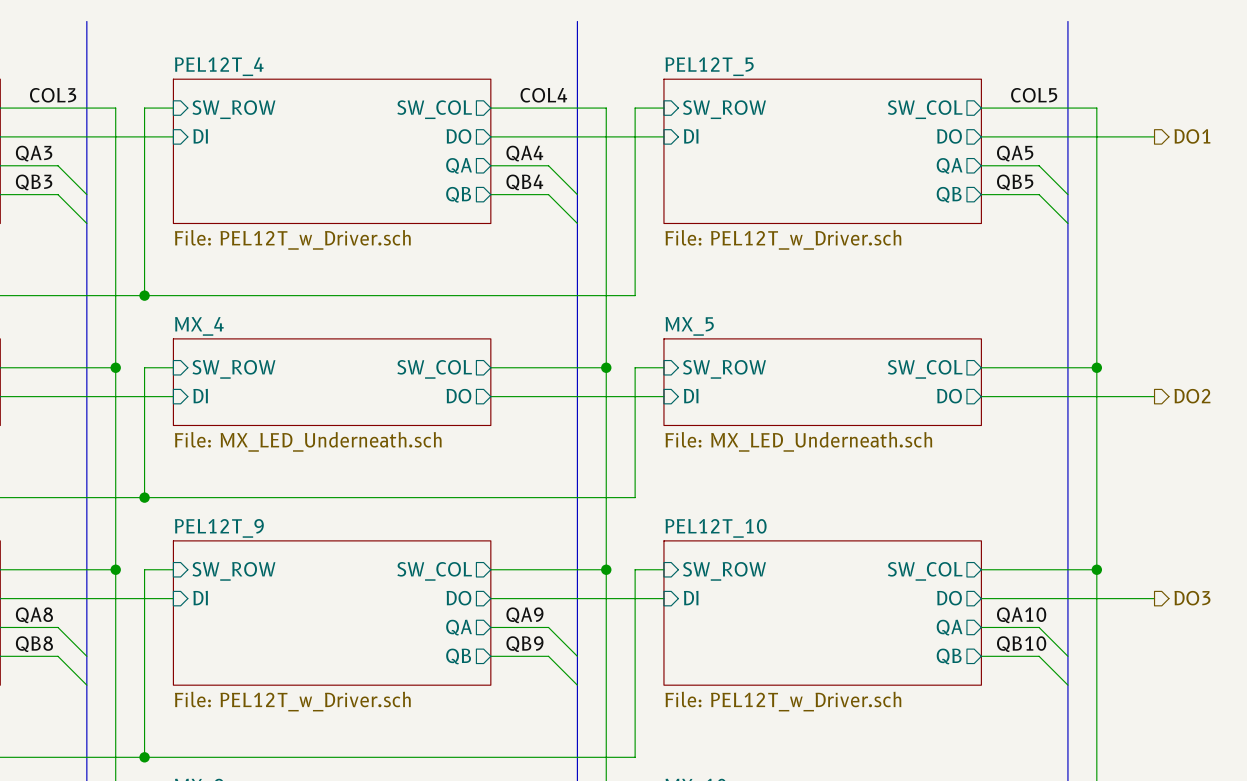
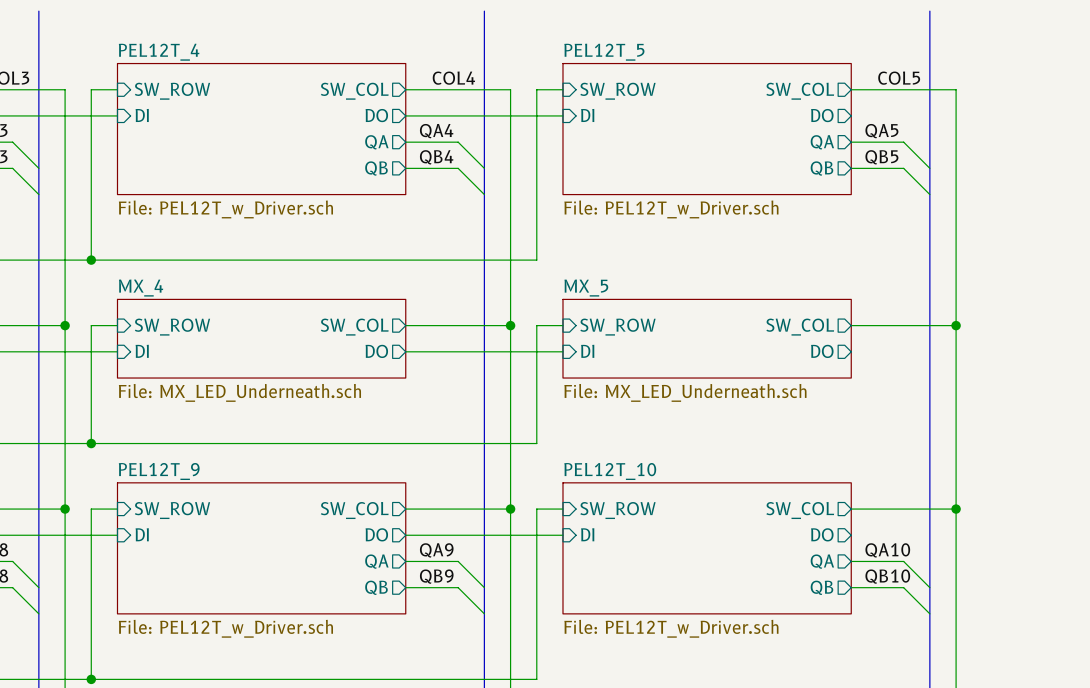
wire: (981, 136) (1154, 136) -> none
hierarchical label: DO1 (1192, 136) -> none
wire: (981, 396) (1154, 396) -> none
hierarchical label: DO2 (1192, 396) -> none
wire: (981, 598) (1154, 598) -> none
hierarchical label: DO3 (1192, 598) -> none

